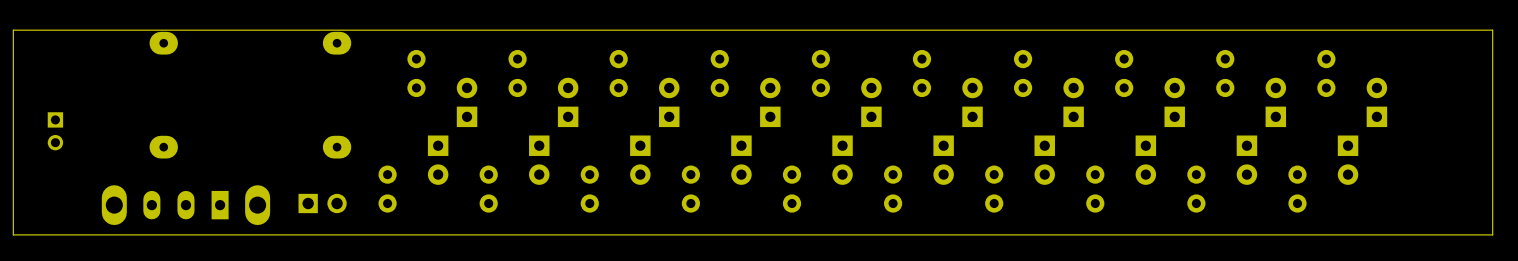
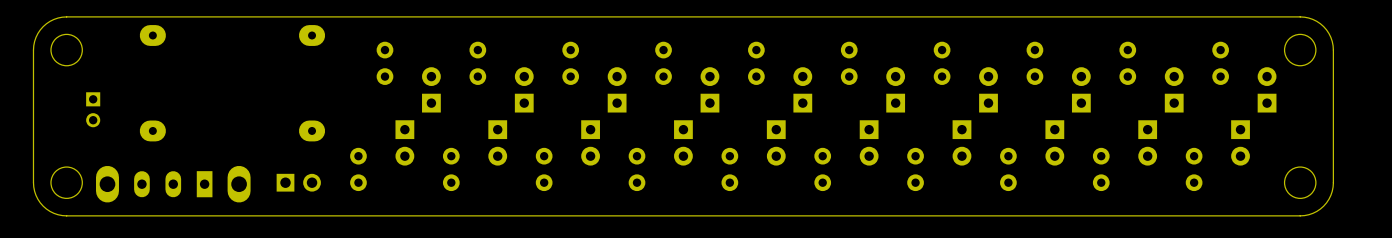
board edge: (1492, 30) (13, 30) (13, 234) (1492, 234) (1492, 30) -> (1300, 16) (1312, 19) (1323, 26) (1330, 37) (1333, 50) (1333, 187) (1328, 199) (1323, 206) (1312, 213) (1304, 215) (66, 215) (53, 213) (43, 206) (36, 195) (33, 187) (33, 45) (36, 37) (43, 26) (50, 21) (62, 17) (1300, 16)
round board edge: none -> [50, 33, 83, 67]
round board edge: none -> [1284, 33, 1317, 67]
part position: (55, 131) -> (93, 109)
round board edge: none -> [50, 166, 83, 199]
round board edge: none -> [1284, 166, 1317, 199]

